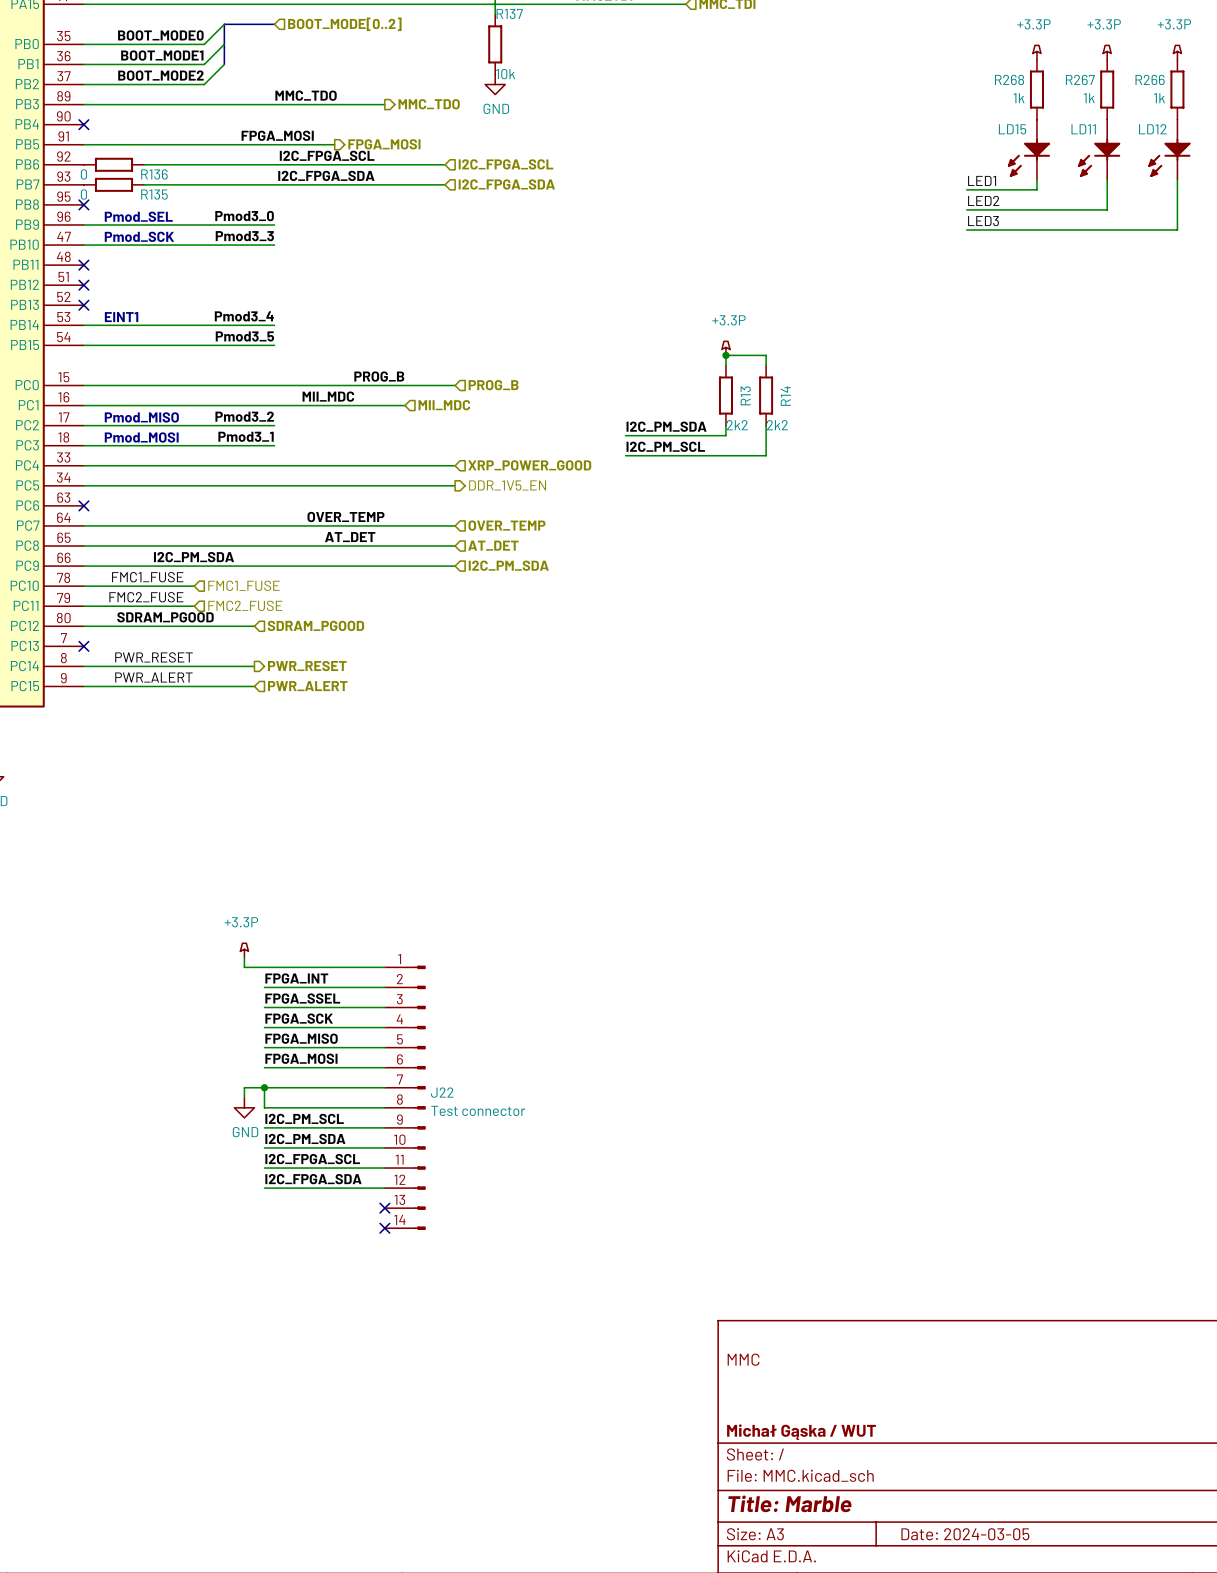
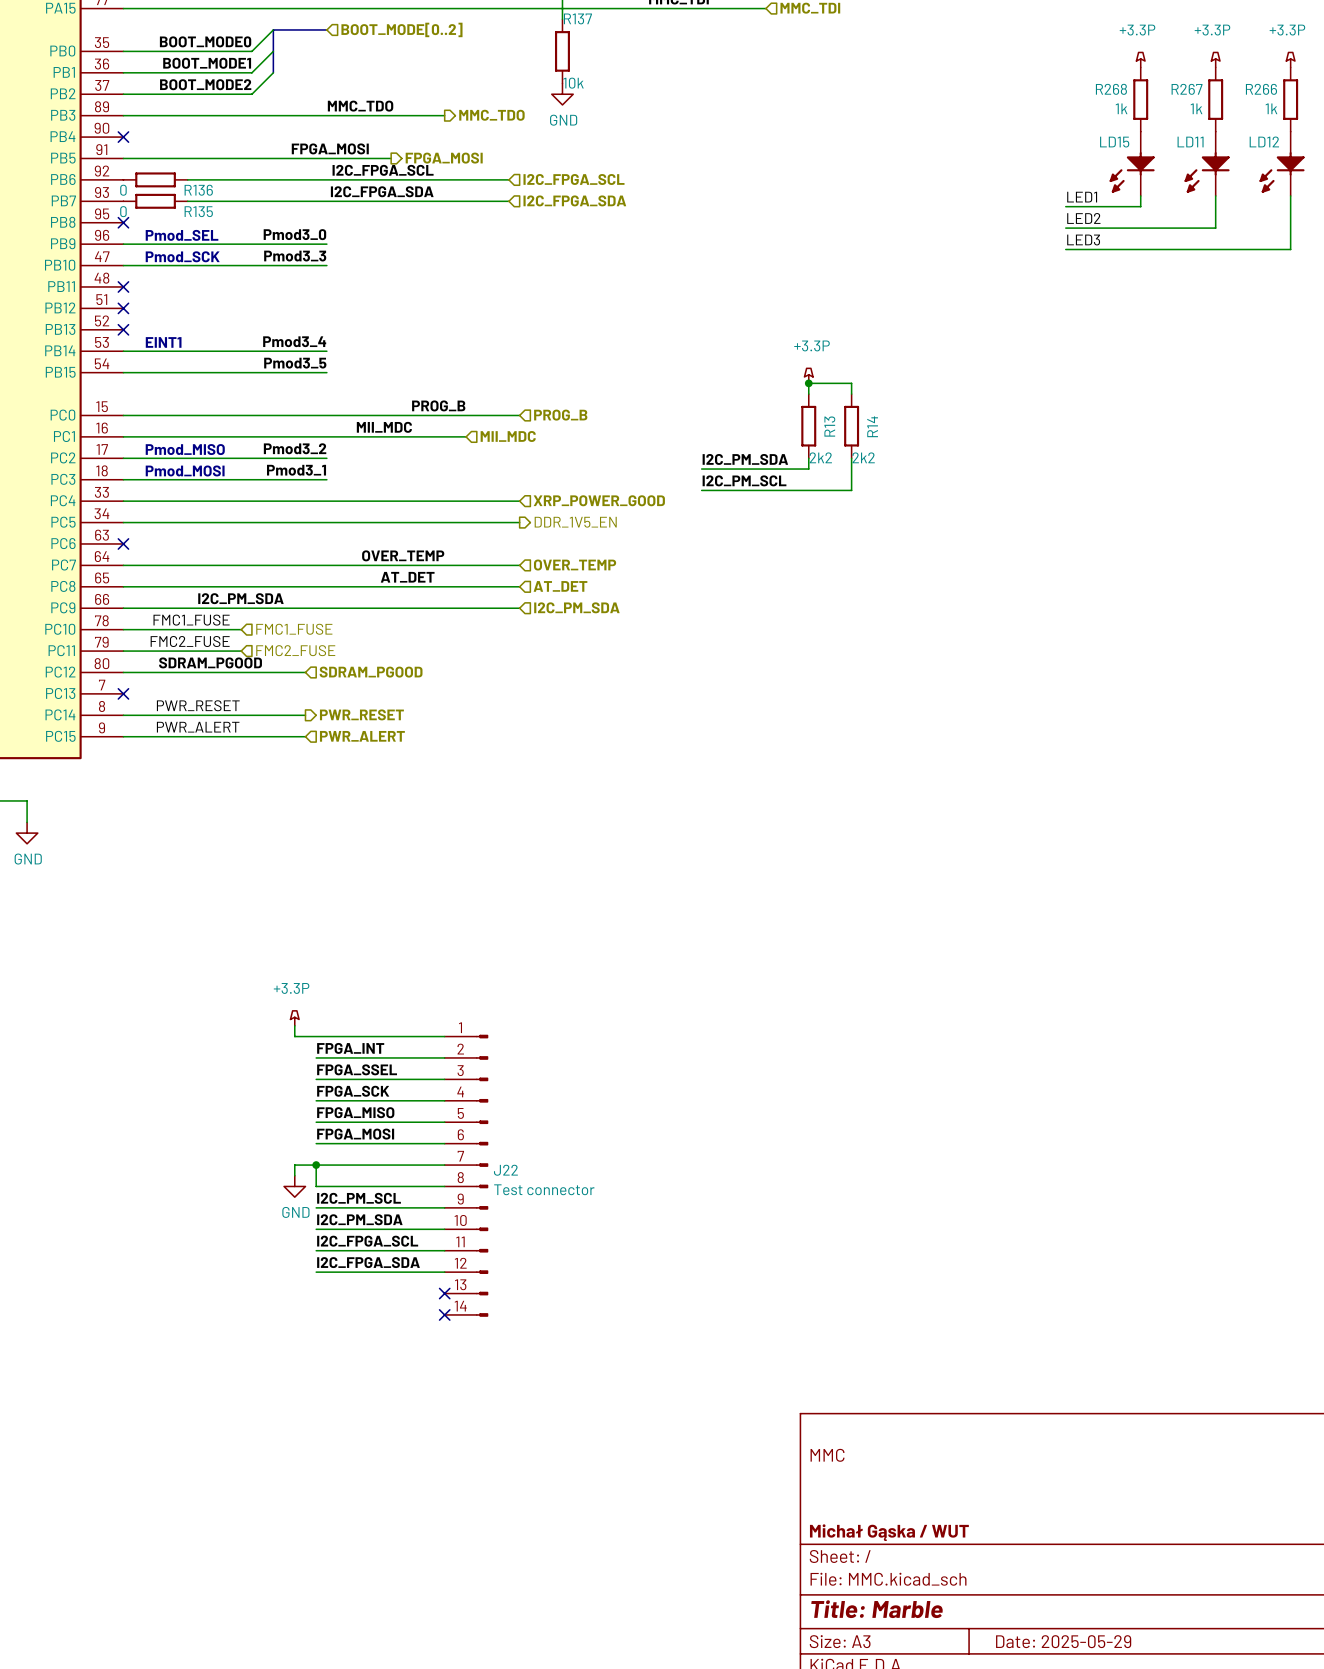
title block: Date: 2024-03-05 (965, 1534) -> Date: 2025-05-29 (1063, 1641)

